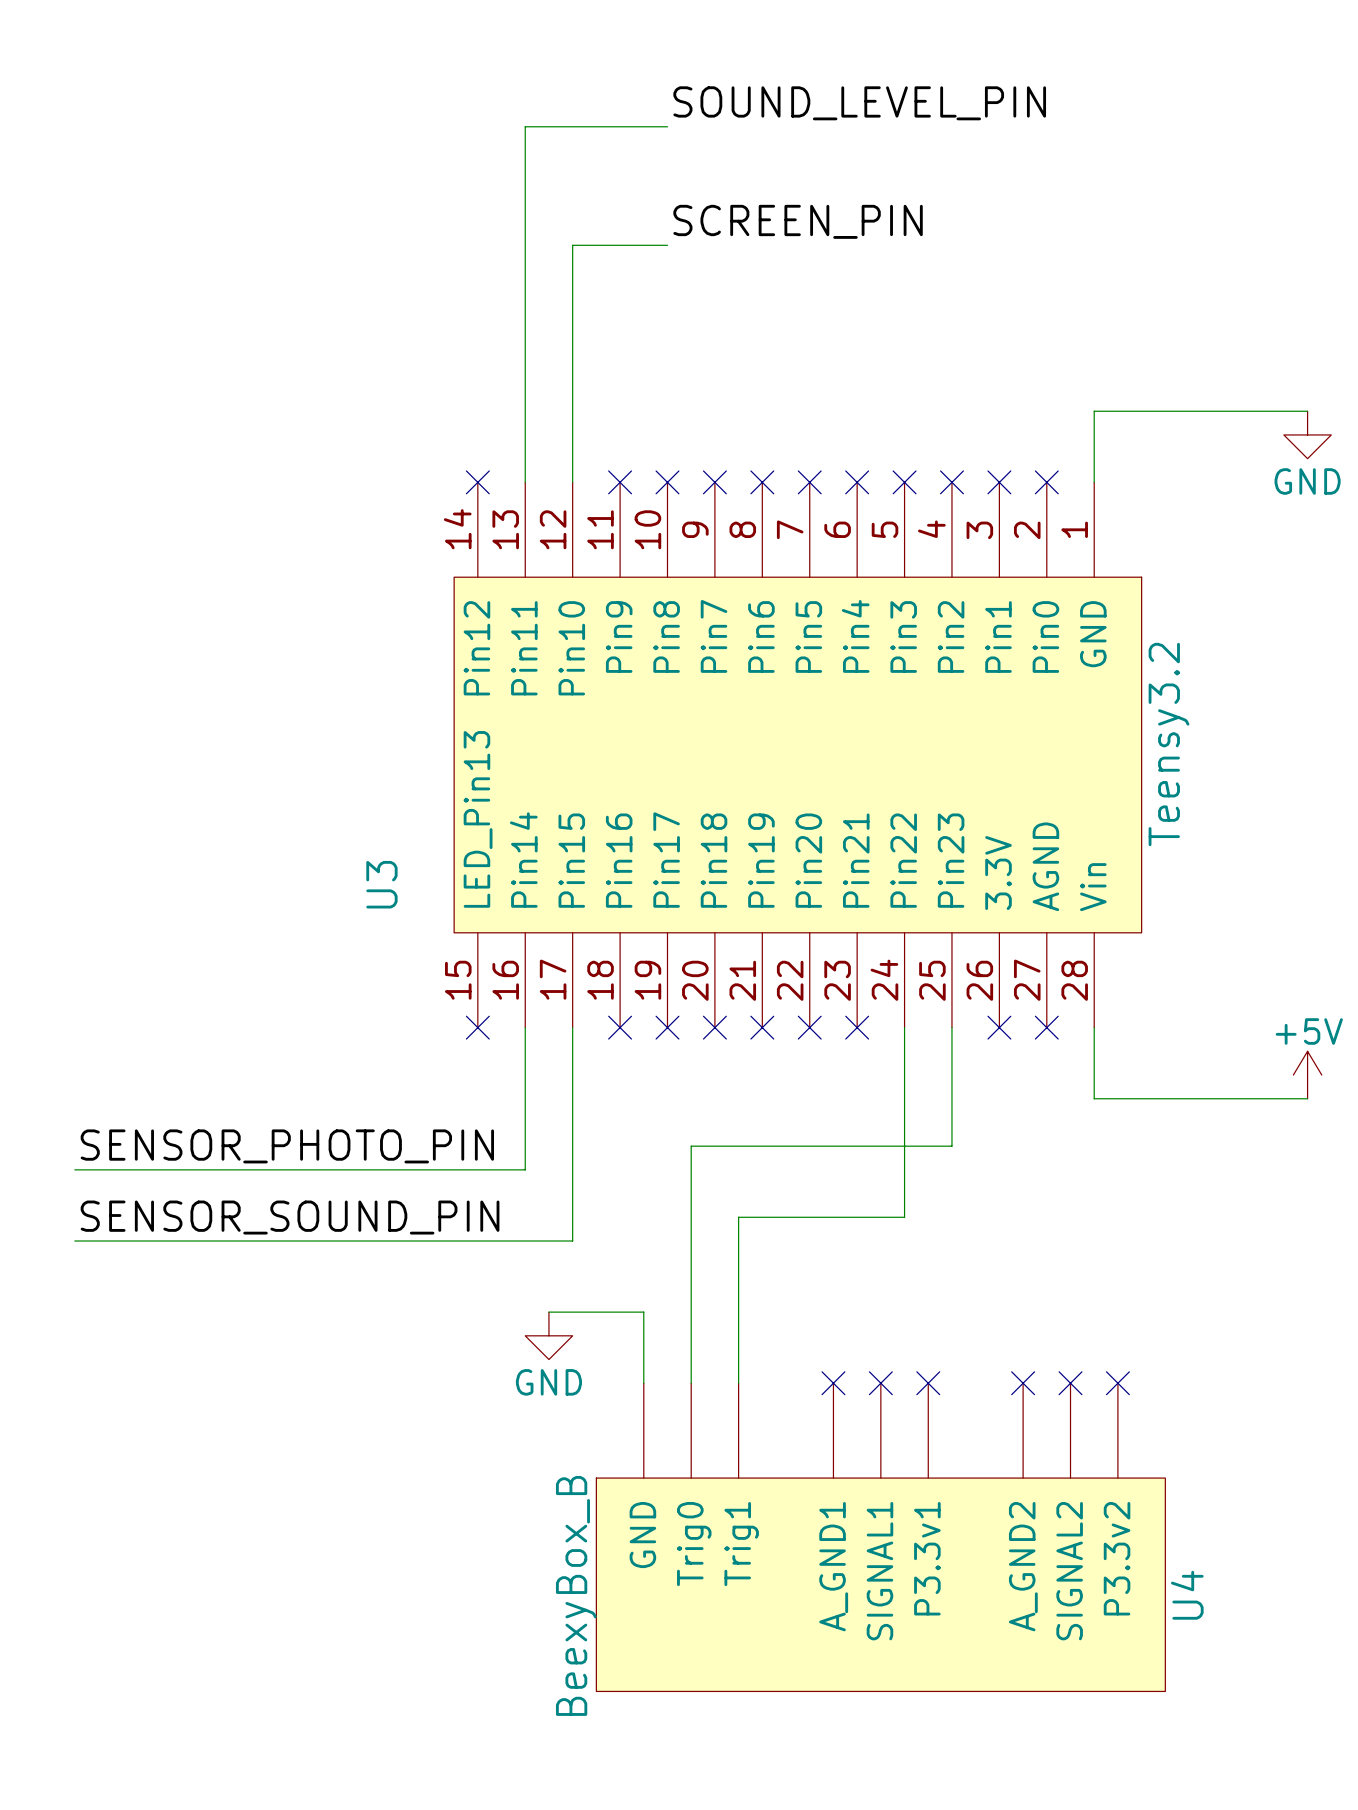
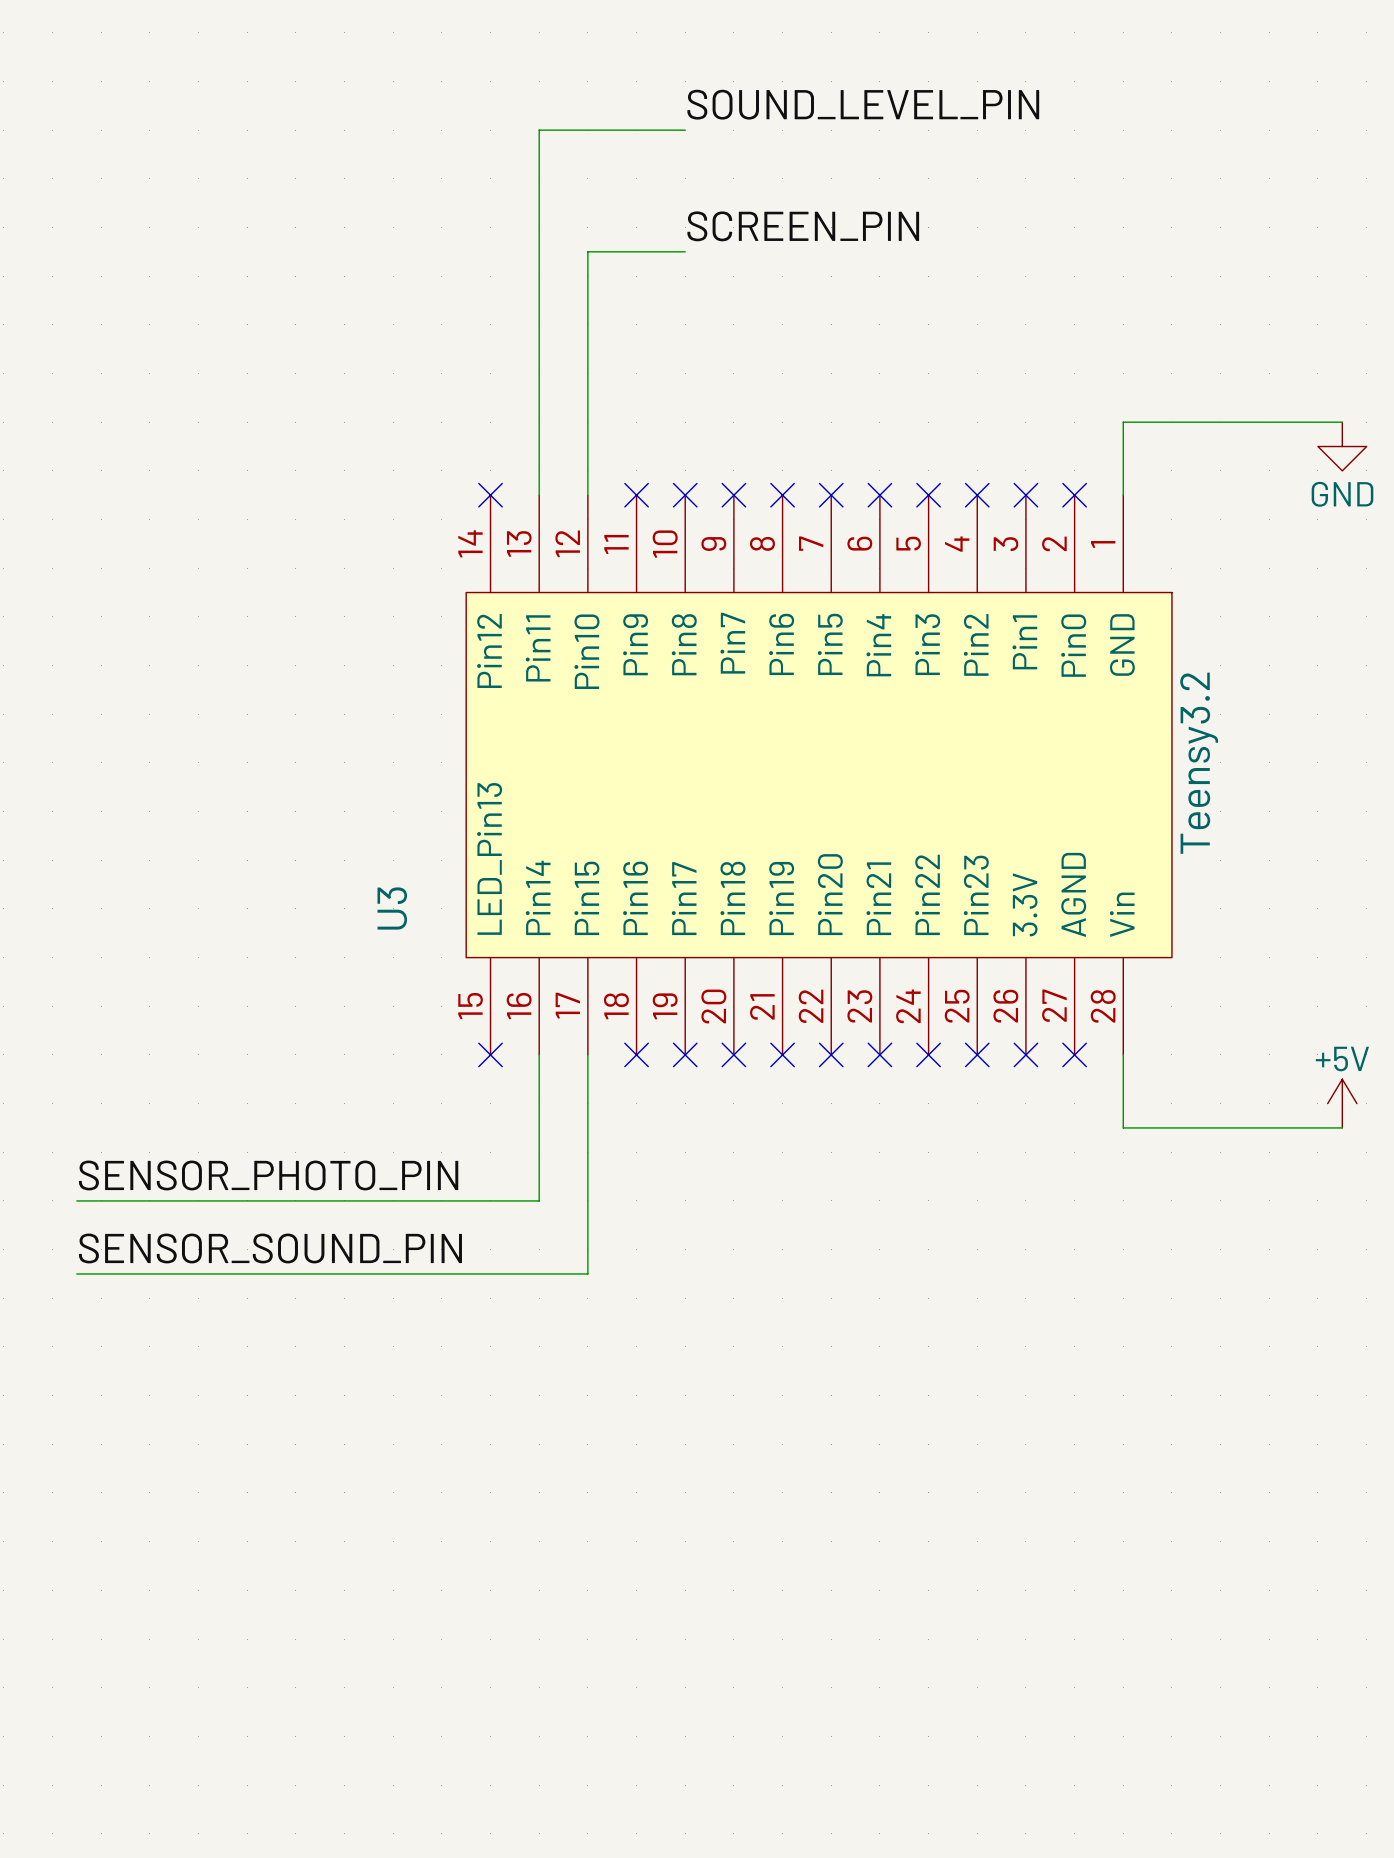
wire: (904, 1027) (904, 1217) (738, 1217) (738, 1383) -> none
no-connect mark: none -> (928, 1054)
wire: (951, 1027) (951, 1146) (691, 1146) (691, 1383) -> none
no-connect mark: none -> (977, 1054)
wire: (548, 1312) (643, 1312) (643, 1383) -> none
power symbol: GND (548, 1335) -> none
no-connect mark: (833, 1383) -> none
no-connect mark: (880, 1383) -> none
no-connect mark: (928, 1383) -> none
no-connect mark: (1023, 1383) -> none
no-connect mark: (1070, 1383) -> none
no-connect mark: (1117, 1383) -> none
U4: BeexyBox_B (880, 1537) -> none

